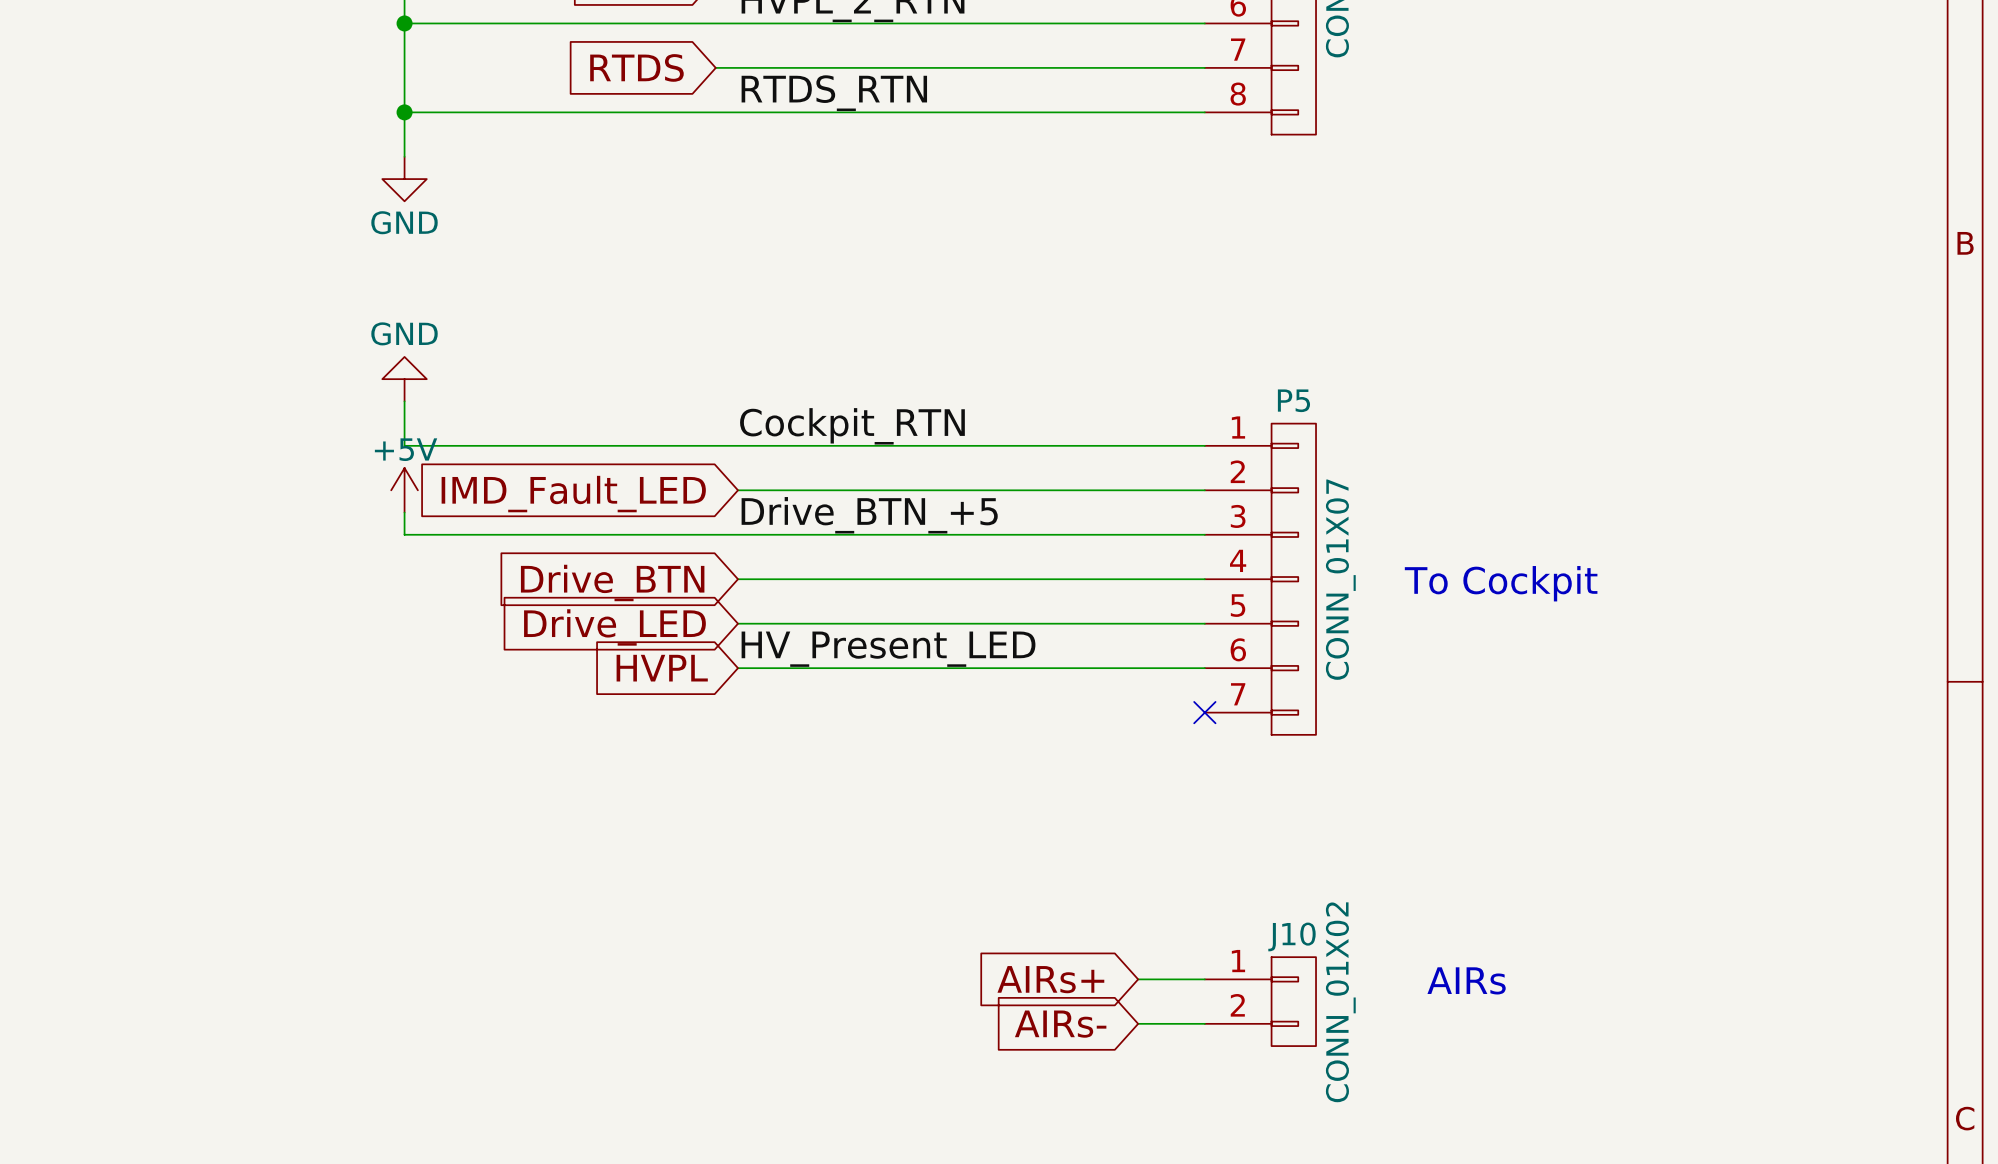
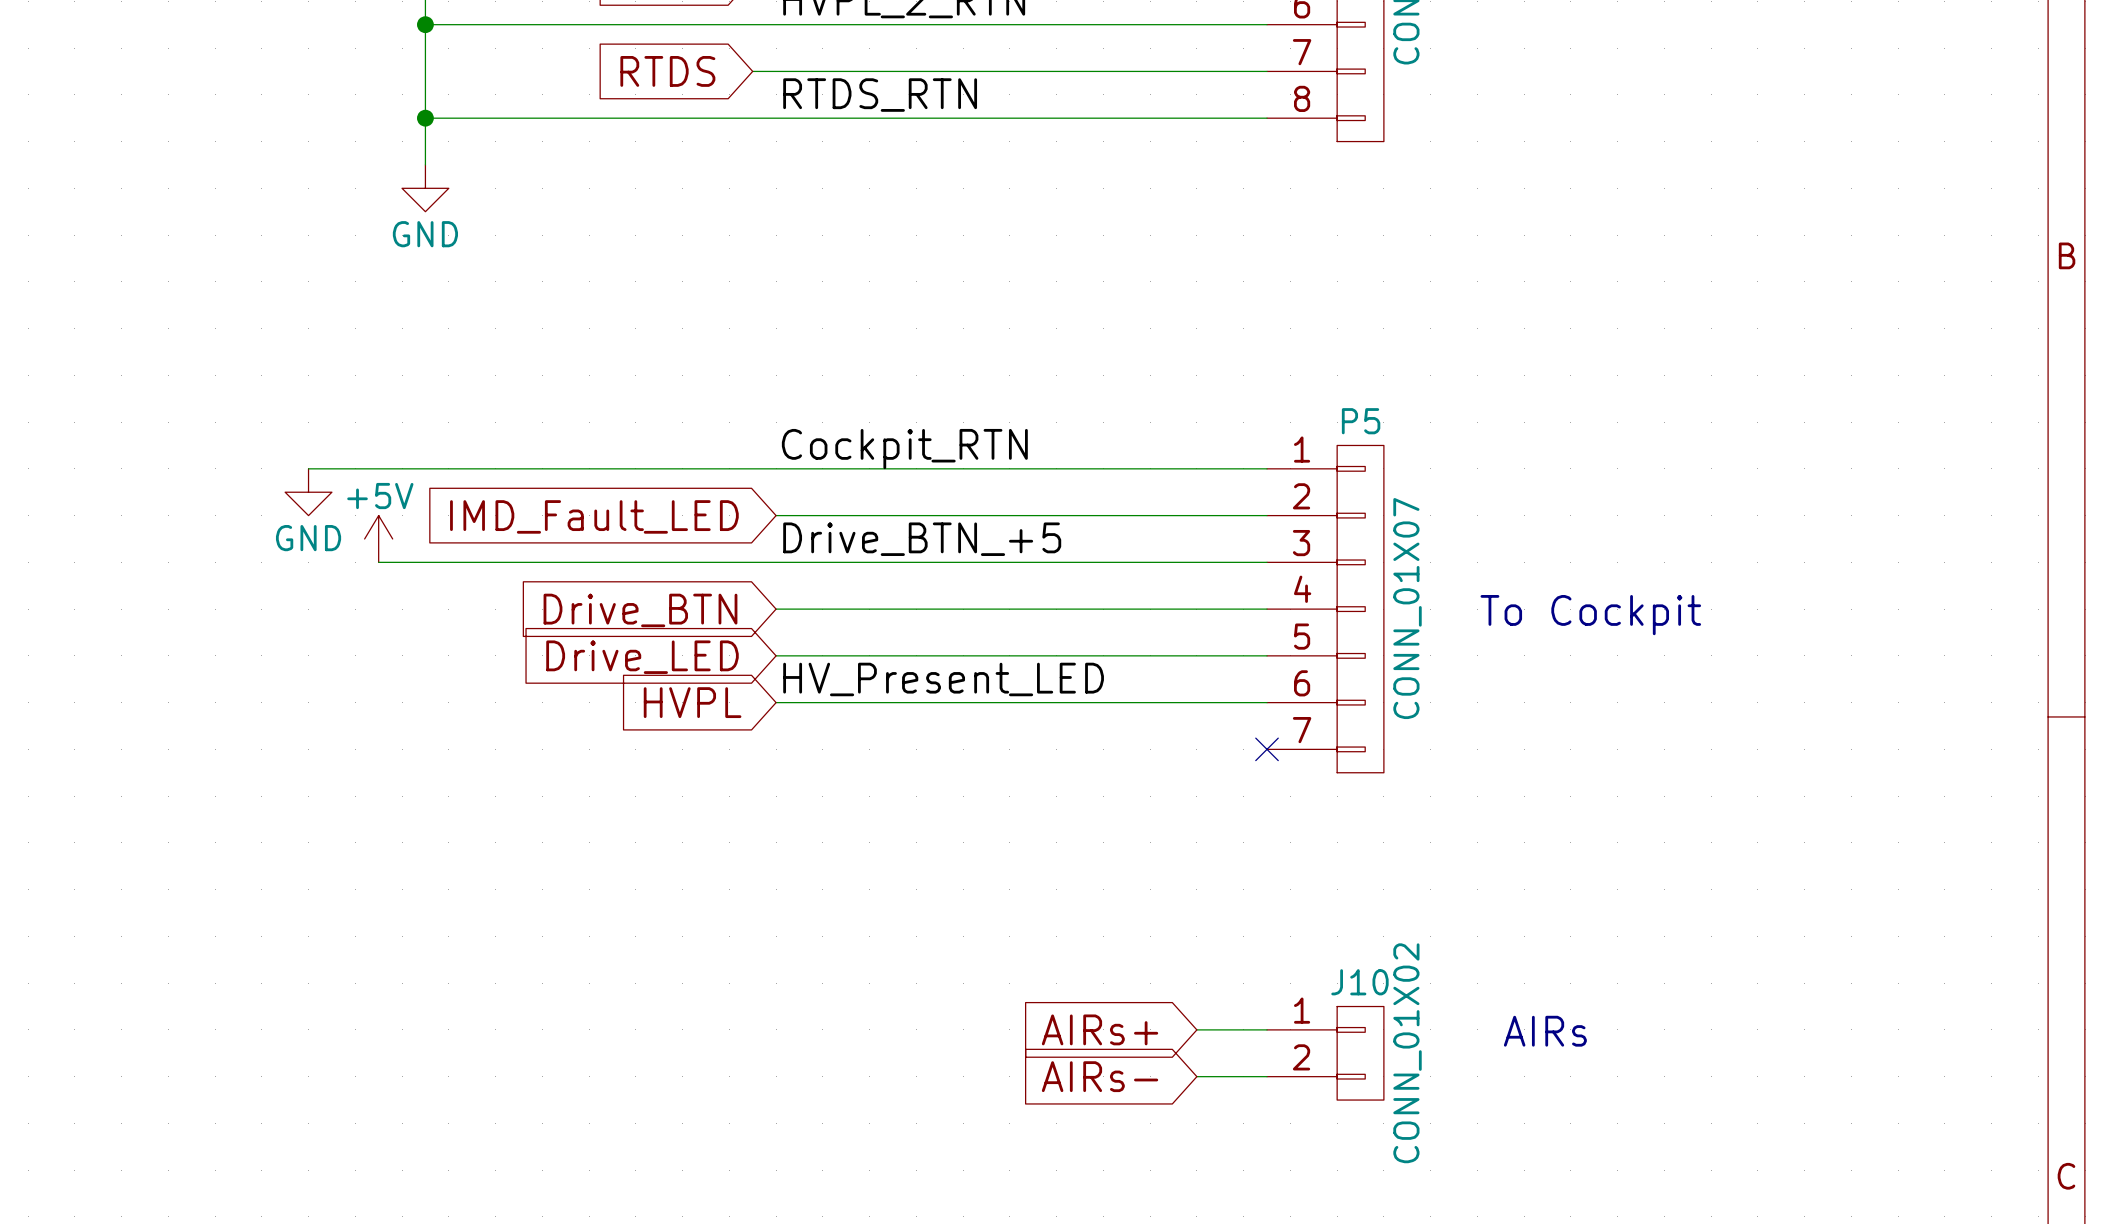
power symbol rotation: 0° (404, 379) -> 180° (308, 492)
power symbol position: GND (404, 379) -> GND (308, 492)
wire: (404, 401) (404, 445) -> (308, 468) (425, 468)
power symbol position: +5V (404, 490) -> +5V (378, 538)
wire: (404, 512) (404, 534) -> (378, 562) (425, 562)

